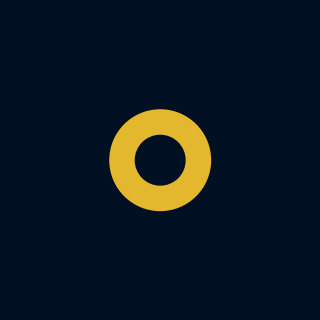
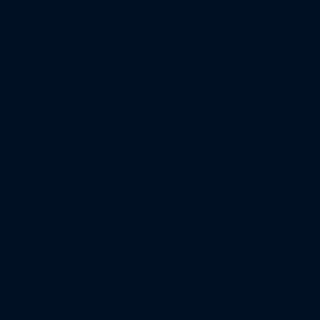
part: (160, 160) -> none

